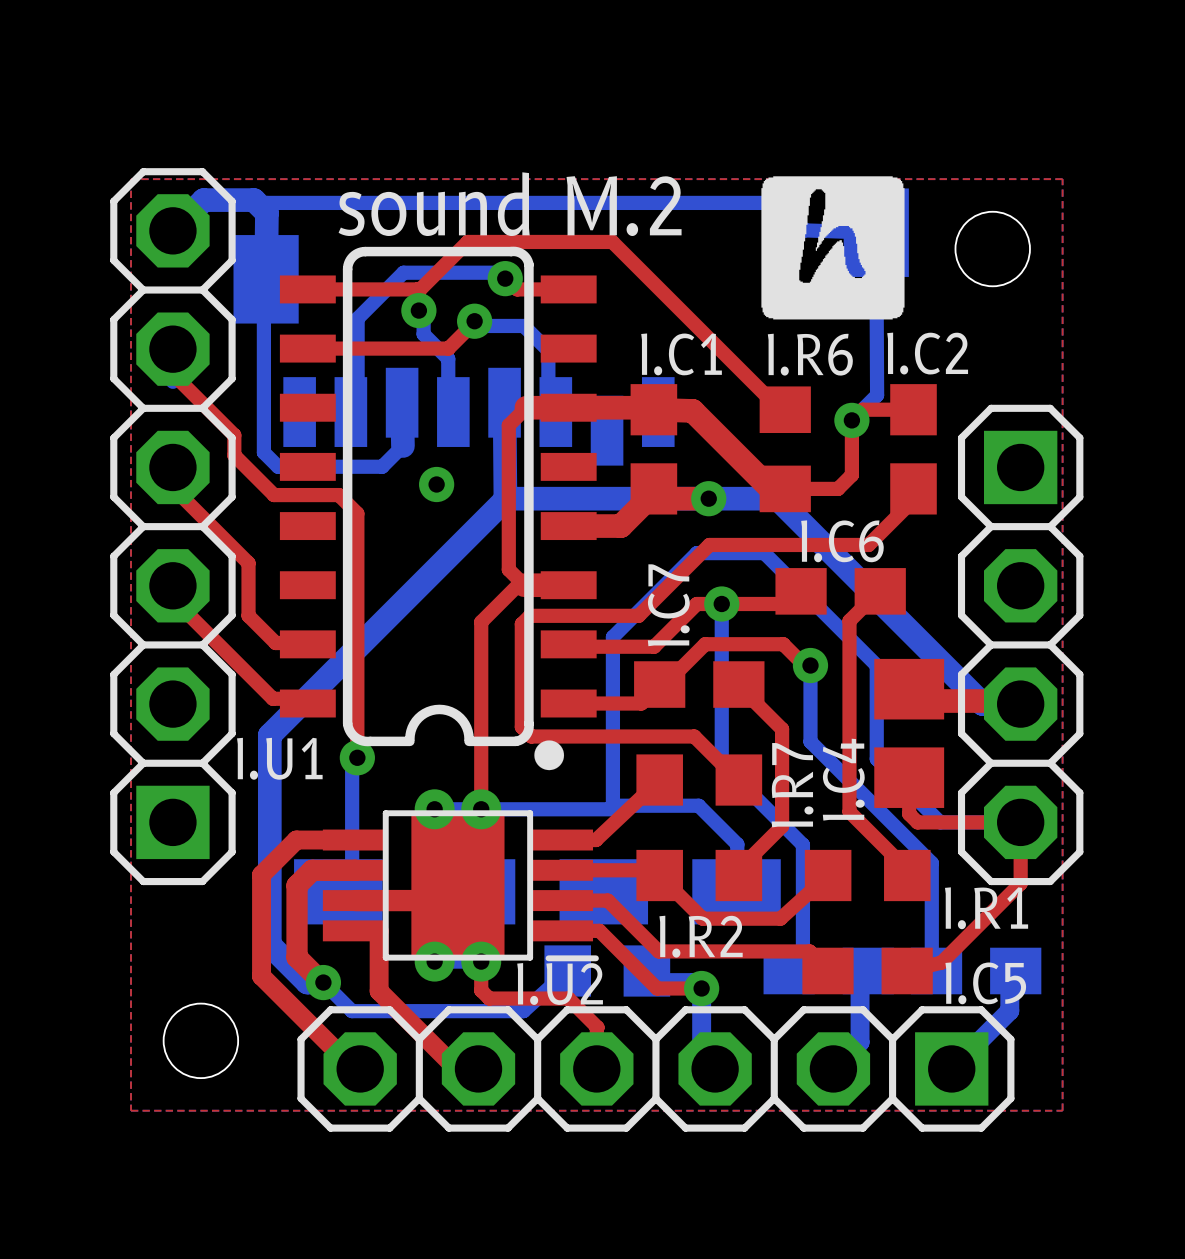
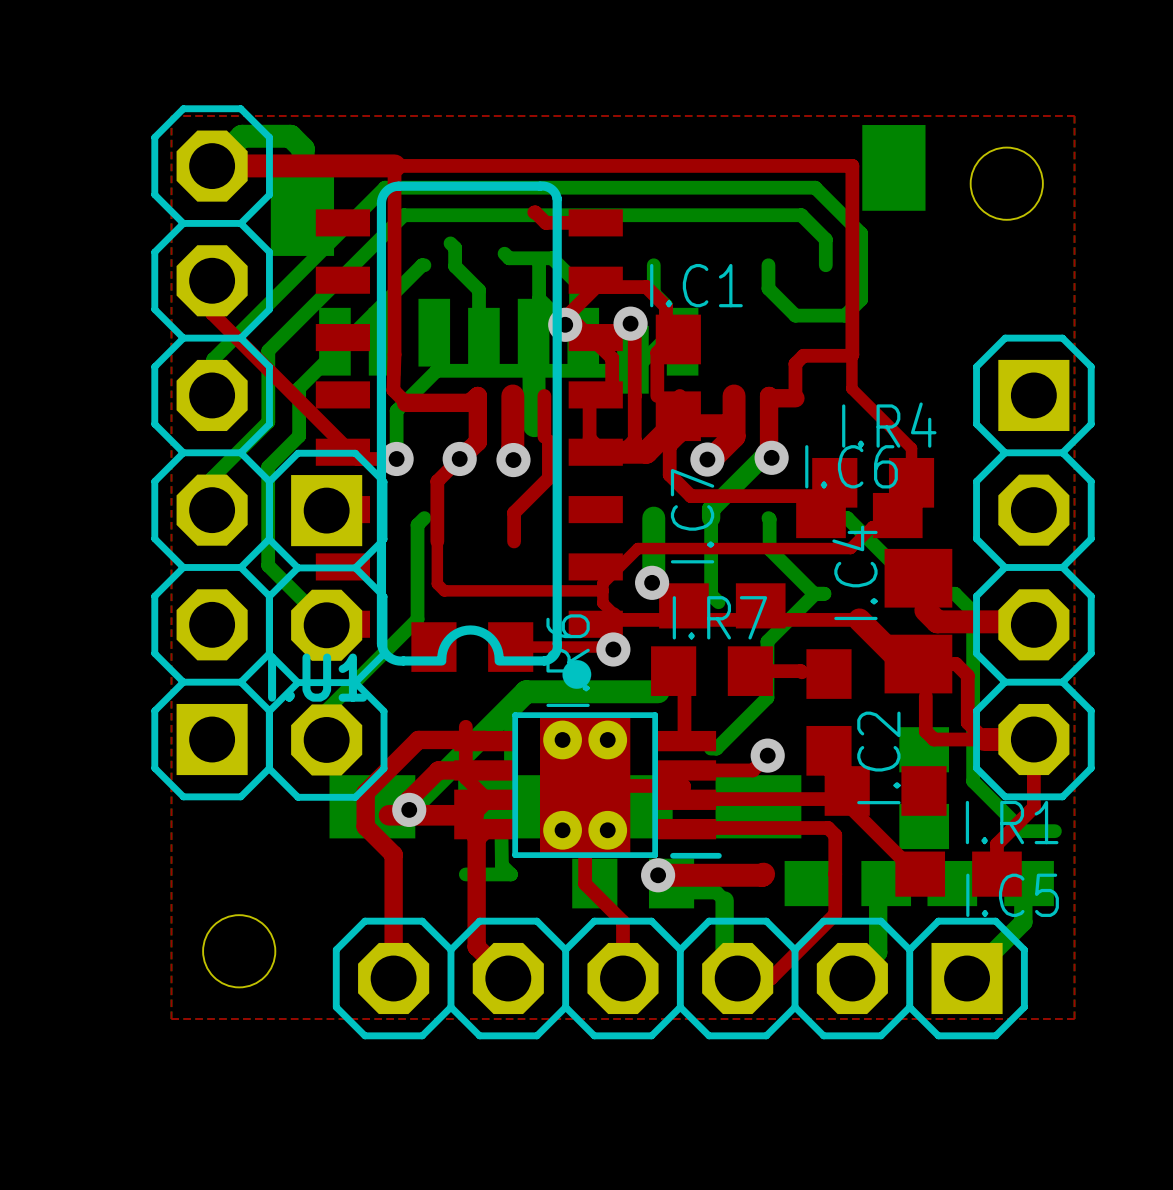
drawing: [761, 176, 905, 320] -> none
text: sound M.2 (510, 204) -> none
top track: none -> (212, 165) (394, 165)
top track: none -> (394, 165) (393, 390) (406, 402) (469, 402) (477, 395) (477, 441) (437, 481) (437, 583) (444, 590) (602, 590)
top track: none -> (394, 165) (852, 165) (852, 354) (850, 355)
bottom track: (505, 278) (499, 272) (403, 272) (357, 318) (357, 403) (350, 412) -> none
via: (505, 278) -> none
top track: (307, 289) (420, 289) (467, 241) (612, 241) (782, 412) (785, 409) -> none
via: (418, 310) -> none
top track: (474, 321) (448, 348) (307, 348) -> none
via: (474, 321) -> none
bottom track: none -> (424, 265) (422, 265) (299, 388) (299, 436) (268, 467) (268, 565) (326, 625)
bottom track: none -> (539, 265) (539, 298) (565, 324)
bottom track: none -> (653, 265) (653, 293) (666, 305) (666, 338) (633, 370) (436, 370) (396, 410) (396, 458)
bottom track: none -> (768, 265) (768, 288) (795, 315) (845, 315) (861, 299) (861, 233) (815, 187) (384, 187) (213, 359) (212, 395)
bottom track: none -> (825, 265) (825, 239) (801, 215) (403, 215) (268, 350) (268, 421) (212, 478) (212, 510)
I.C2 name rotation: 0° (927, 353) -> 90° counterclockwise (878, 757)
top track: (172, 373) (234, 435) (234, 455) (274, 495) (338, 495) (357, 513) (358, 756) -> (212, 304) (212, 313) (357, 458) (396, 458)
top track: none -> (630, 323) (634, 323) (634, 439) (624, 449) (600, 449) (589, 438) (589, 395)
via: none -> (630, 323)
via: none -> (565, 324)
bottom track: (402, 402) (402, 446) (382, 466) (278, 466) (263, 452) (263, 280) (266, 279) (266, 202) (777, 202) (804, 230) (876, 232) (877, 395) (851, 420) -> none
via: (851, 420) -> none
top track: (908, 420) (913, 409) (862, 409) (851, 420) (851, 475) (838, 488) (785, 488) -> none
I.R6 rotation: 0° (785, 449) -> 90° clockwise (472, 647)
I.R6 position: (785, 449) -> (472, 647)
I.C2 position: (913, 449) -> (828, 712)
top track: (172, 467) (172, 487) (248, 563) (248, 615) (275, 643) (307, 644) -> none
top track: none -> (512, 395) (513, 460)
top track: none -> (544, 395) (544, 436) (548, 441) (548, 477) (514, 512) (514, 541)
top track: none -> (612, 395) (612, 358) (577, 324) (565, 324) (565, 317) (596, 287) (646, 287) (666, 306) (666, 343) (657, 352) (657, 395)
top track: none -> (679, 395) (679, 436) (669, 446) (669, 474) (690, 496) (821, 496) (834, 483)
top track: none -> (734, 395) (734, 436) (710, 459) (707, 459)
via: (436, 484) -> none
top track: (785, 488) (773, 491) (692, 410) (653, 409) (650, 407) (526, 407) (508, 425) (508, 569) (524, 585) (568, 585) (518, 585) (481, 622) (481, 809) -> none
top track: (913, 488) (913, 500) (868, 544) (709, 544) (638, 615) (530, 615) (521, 624) (521, 727) (531, 736) (694, 736) (724, 766) (724, 769) (738, 780) -> none
via position: (708, 498) -> (707, 459)
bottom track: none -> (771, 457) (761, 458) (711, 509) (711, 594) (718, 602)
via: none -> (771, 457)
via: none -> (396, 458)
via: none -> (459, 458)
top track: none -> (765, 458) (771, 457) (769, 455) (769, 395) (770, 398) (795, 398) (795, 363) (803, 355) (851, 355) (851, 388) (911, 448) (911, 523) (908, 526) (872, 526) (850, 548) (637, 548) (602, 583) (602, 603) (619, 619) (859, 619) (903, 664) (956, 664) (967, 675) (967, 722) (984, 739) (1033, 739)
via: none -> (513, 460)
I.R4: none -> (873, 482)
top track: (172, 585) (172, 598) (272, 698) (303, 698) (307, 703) -> none
top track: (801, 591) (788, 603) (696, 603) (654, 646) (571, 646) (568, 644) -> none
top track: (880, 591) (849, 620) (849, 811) (907, 869) (907, 875) -> none
bottom track: none -> (424, 518) (417, 524) (417, 619) (326, 710) (326, 739)
bottom track: none -> (653, 518) (653, 575) (650, 583)
bottom track: none -> (768, 518) (769, 549) (814, 593) (824, 593)
bottom track: none -> (825, 518) (847, 518) (923, 593) (954, 593) (973, 611) (973, 781) (1023, 831) (1054, 831)
bottom track: (721, 603) (721, 763) (802, 844) (802, 957) (789, 970) -> none
via: (721, 603) -> none
via: none -> (652, 582)
top track: (810, 665) (804, 665) (783, 644) (705, 644) (660, 688) (659, 684) (641, 703) (568, 703) -> none
bottom track: (810, 665) (810, 741) (931, 863) (931, 963) (936, 970) -> none
via: (810, 665) -> none
bottom track: none -> (815, 593) (767, 641) (767, 697) (716, 748) (710, 748)
top track: (738, 684) (782, 729) (782, 826) (738, 869) (738, 875) -> none
part: none -> (326, 625)
bottom track: (1020, 704) (982, 704) (777, 498) (505, 498) (269, 735) (269, 945) (307, 982) (323, 982) (352, 1011) (523, 1011) (567, 970) -> none
top track: none -> (510, 647) (613, 648)
via: none -> (613, 649)
I.C4 position: (909, 733) -> (918, 621)
top track: none -> (673, 671) (684, 682) (684, 741)
top track: none -> (750, 671) (801, 672)
bottom track: (357, 757) (352, 763) (352, 876) (338, 891) -> none
via: (357, 757) -> none
bottom track: none -> (658, 691) (526, 691) (409, 809)
I.C4 name position: I.C4 (843, 779) -> I.C4 (854, 572)
top track: (659, 780) (596, 840) (560, 840) -> none
I.R7 position: (699, 780) -> (712, 671)
I.R7 name rotation: 0° (792, 785) -> 90° clockwise (719, 617)
bottom track: (612, 805) (698, 805) (737, 844) (736, 891) -> none
bottom track: (434, 809) (612, 809) (612, 637) (696, 553) (764, 553) (876, 665) (876, 758) (940, 822) (1020, 822) -> none
top track: none -> (767, 755) (752, 770) (684, 770)
via: none -> (767, 755)
top track: (355, 840) (296, 840) (261, 874) (261, 976) (354, 1068) (360, 1068) -> (485, 741) (418, 739) (365, 792) (365, 826) (393, 854) (393, 978)
top track: none -> (485, 770) (438, 770) (409, 799) (409, 809)
part: none -> (587, 785)
top track: (355, 870) (312, 870) (297, 885) (297, 957) (323, 982) -> none
top track: (659, 875) (702, 918) (780, 918) (828, 875) -> none
I.R2 side: top (699, 875) -> bottom (924, 788)
top track: (1020, 883) (941, 962) (907, 970) -> (1033, 798) (1033, 807) (996, 844) (996, 874)
top track: none -> (684, 799) (842, 799) (917, 874) (920, 874)
I.U2: (460, 885) -> none
via: none -> (409, 809)
top track: (560, 900) (607, 900) (658, 951) (809, 951) (827, 970) -> none
top track: none -> (699, 829) (684, 829) (828, 828) (835, 835) (835, 914) (771, 978) (737, 978)
top track: (355, 930) (379, 930) (379, 991) (456, 1068) (478, 1068) -> (485, 829) (476, 838) (476, 946) (508, 978)
top track: (560, 930) (599, 930) (657, 988) (701, 988) -> none
top track: (481, 961) (481, 990) (489, 998) (568, 998) (596, 1028) -> (585, 785) (585, 883) (622, 921) (622, 939)
top track: none -> (758, 874) (763, 874) (658, 875)
I.C5 position: (867, 970) -> (958, 874)
via: (323, 982) -> none
via position: (701, 988) -> (658, 875)

